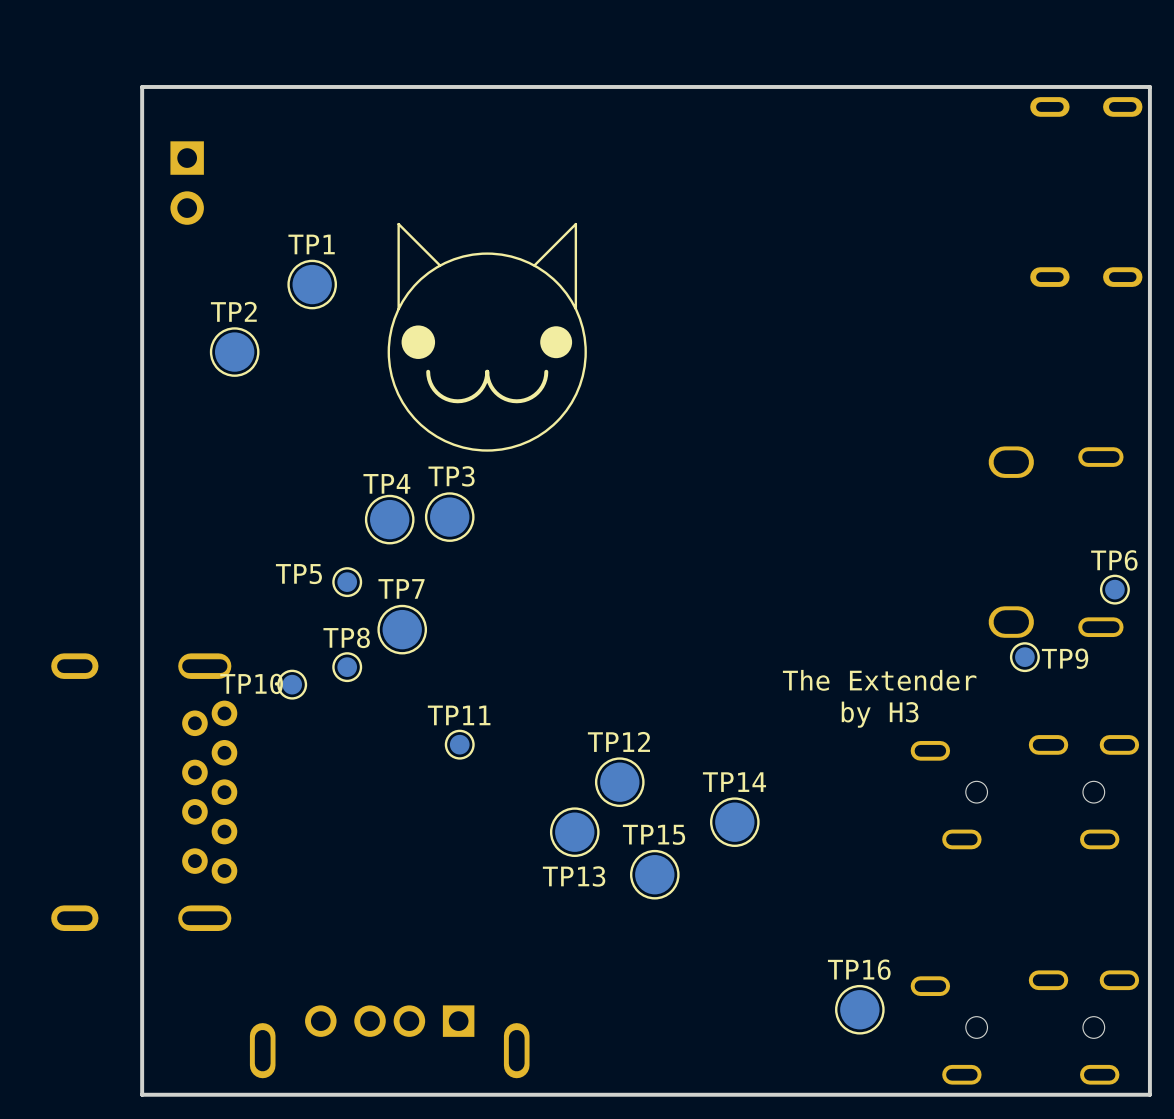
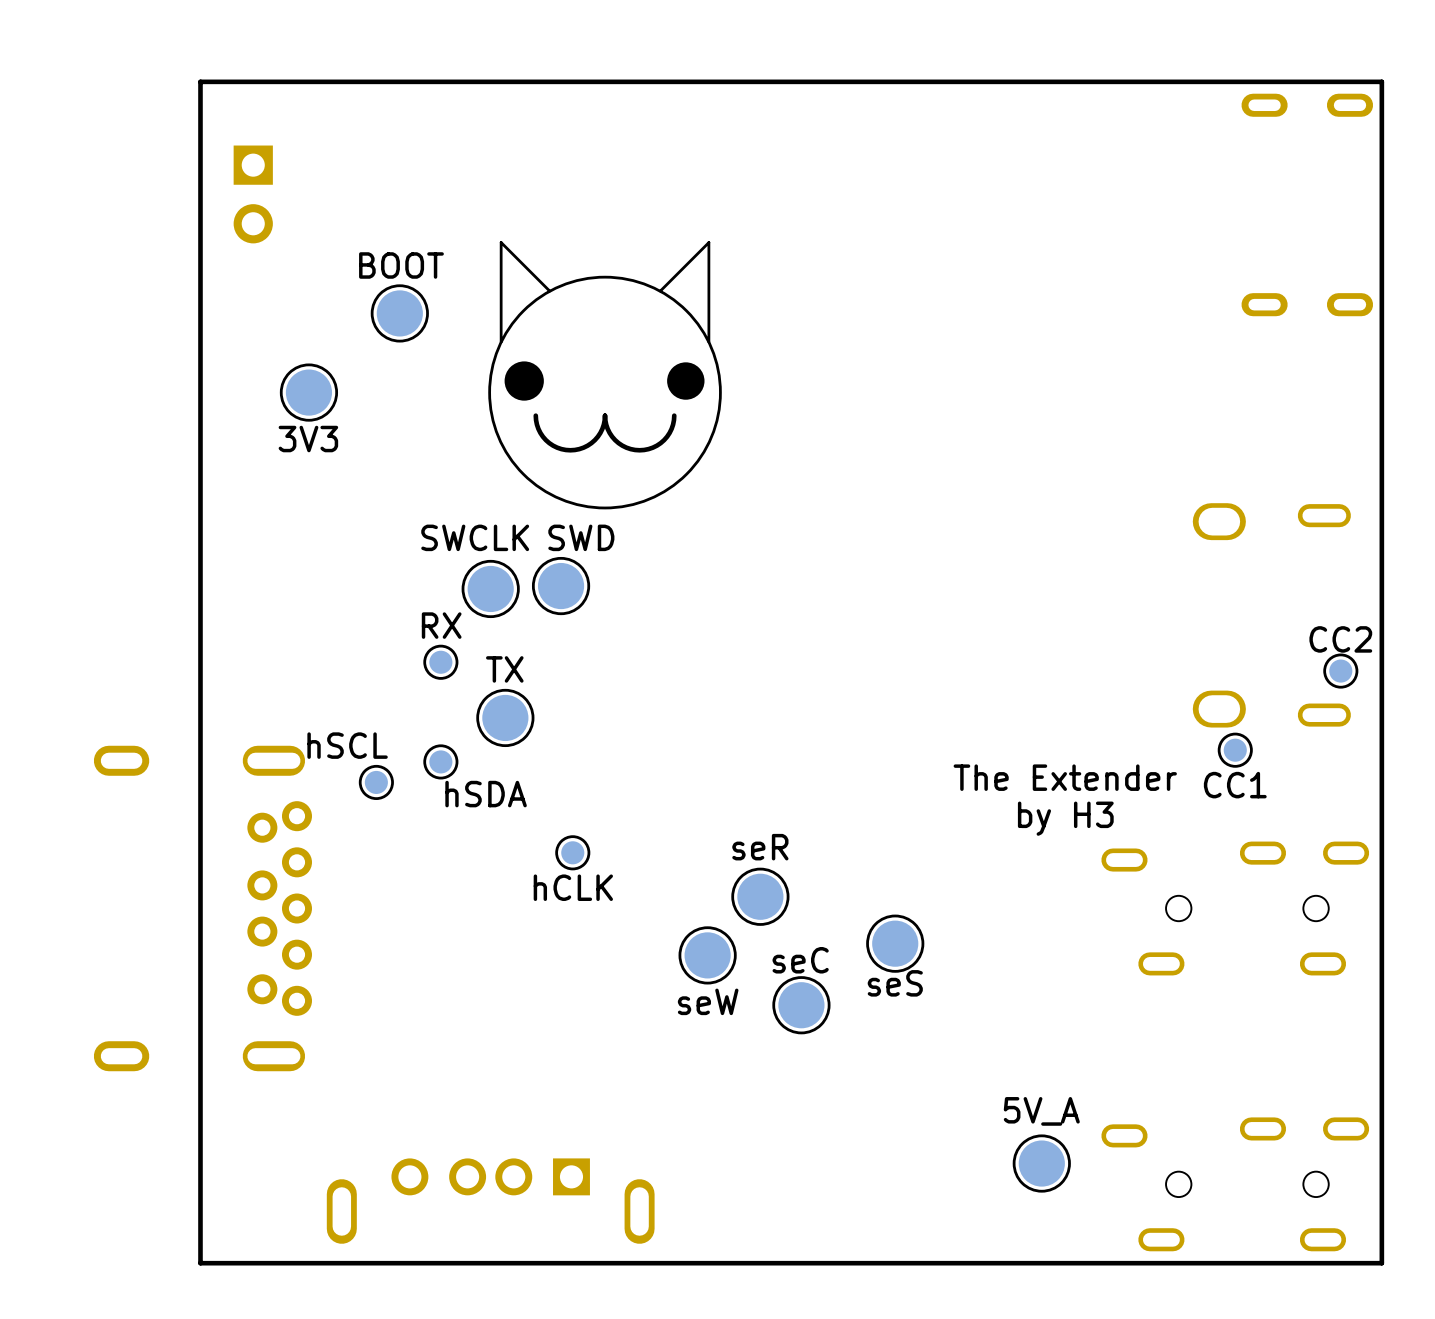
TP1 value: none -> BOOT (401, 265)
TP1 name: TP1 (311, 244) -> none
TP2 name: TP2 (233, 311) -> none
TP2 value: none -> 3V3 (308, 439)
TP4 value: none -> SWCLK (475, 537)
TP3 name: TP3 (451, 476) -> none
TP3 value: none -> SWD (581, 537)
TP4 name: TP4 (386, 483) -> none
TP5 value: none -> RX (441, 625)
TP6 name: TP6 (1114, 560) -> none
TP6 value: none -> CC2 (1340, 639)
TP5 name: TP5 (298, 574) -> none
TP7 name: TP7 (401, 588) -> none
TP7 value: none -> TX (504, 669)
TP8 name: TP8 (346, 637) -> none
TP10 value: none -> hSCL (347, 745)
TP9 name: TP9 (1065, 658) -> none
TP10 name: TP10 (251, 683) -> none
TP9 value: none -> CC1 (1235, 785)
TP8 value: none -> hSDA (486, 794)
TP11 name: TP11 (459, 715) -> none
TP12 value: none -> seR (760, 847)
TP12 name: TP12 (618, 741) -> none
TP11 value: none -> hCLK (573, 887)
TP14 name: TP14 (734, 782) -> none
TP15 name: TP15 (654, 834) -> none
TP15 value: none -> seC (800, 960)
TP14 value: none -> seS (895, 983)
TP13 value: none -> seW (708, 1001)
TP13 name: TP13 (574, 876) -> none
TP16 value: none -> 5V_A (1041, 1111)
TP16 name: TP16 (859, 969) -> none

